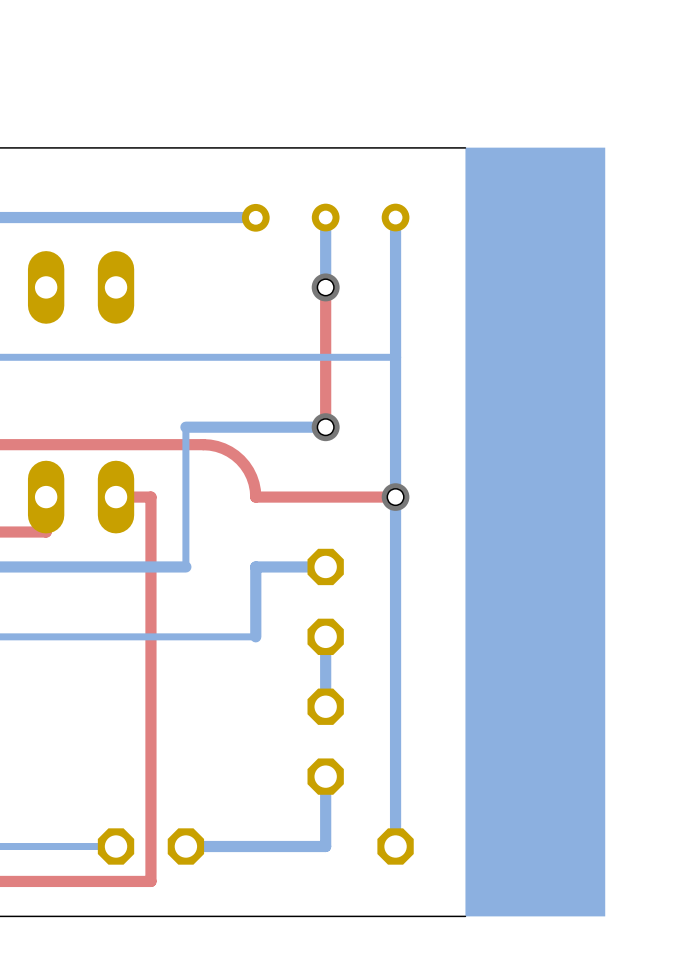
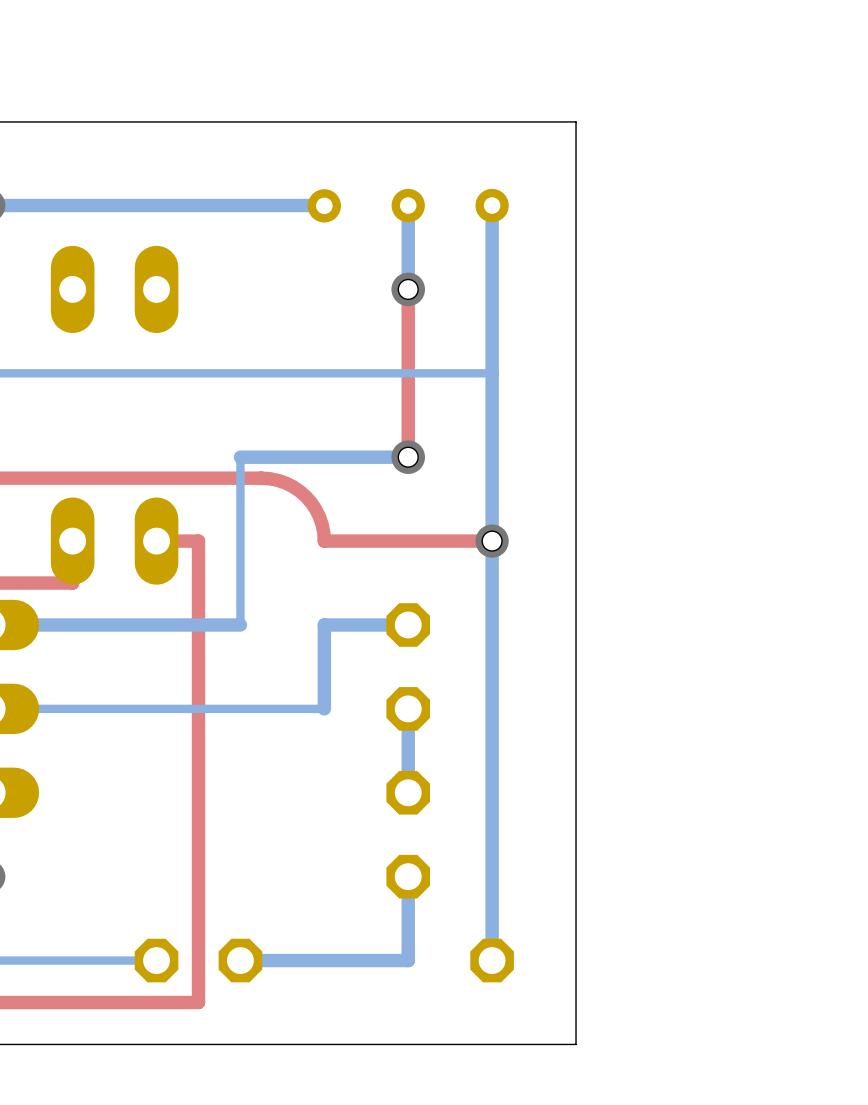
board edge: none -> (576, 121) (576, 1044)
drawing: [465, 147, 606, 917] -> none

